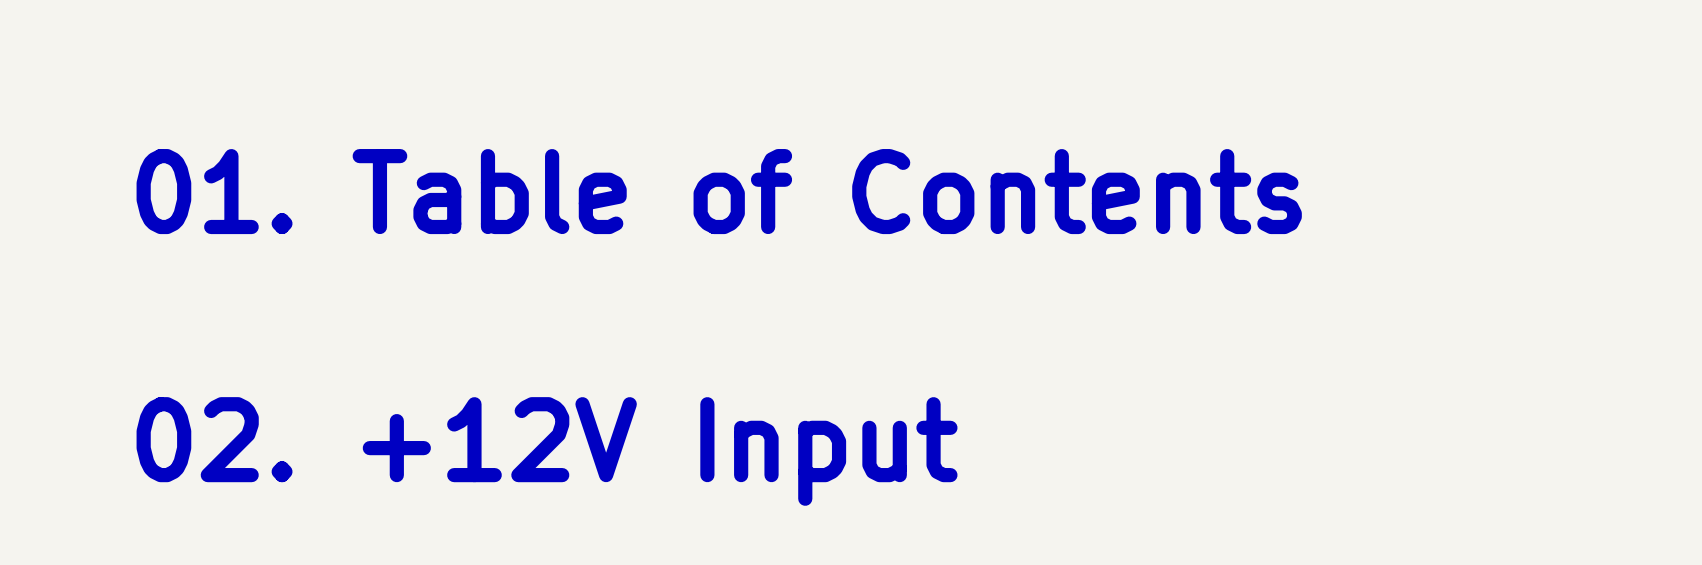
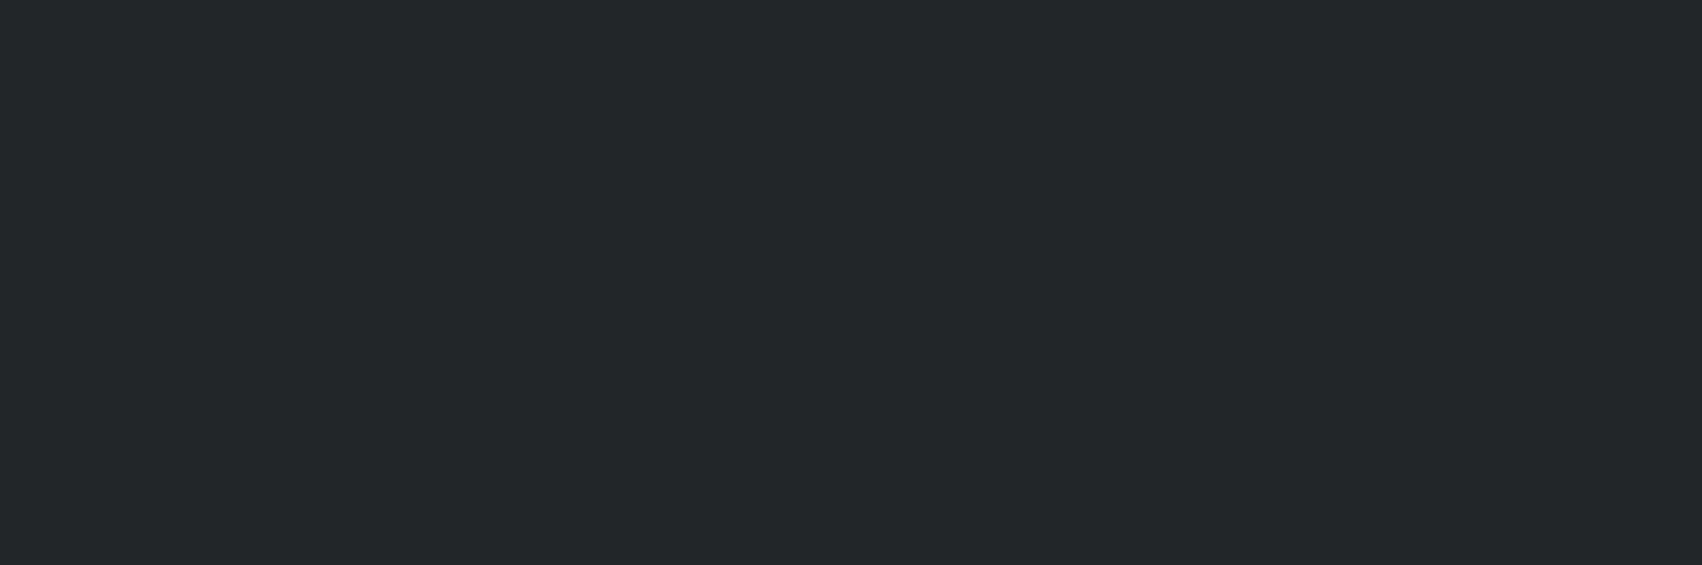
text: 01. Table of Contents (719, 191) -> none
text: 02. +12V Input (547, 451) -> none

